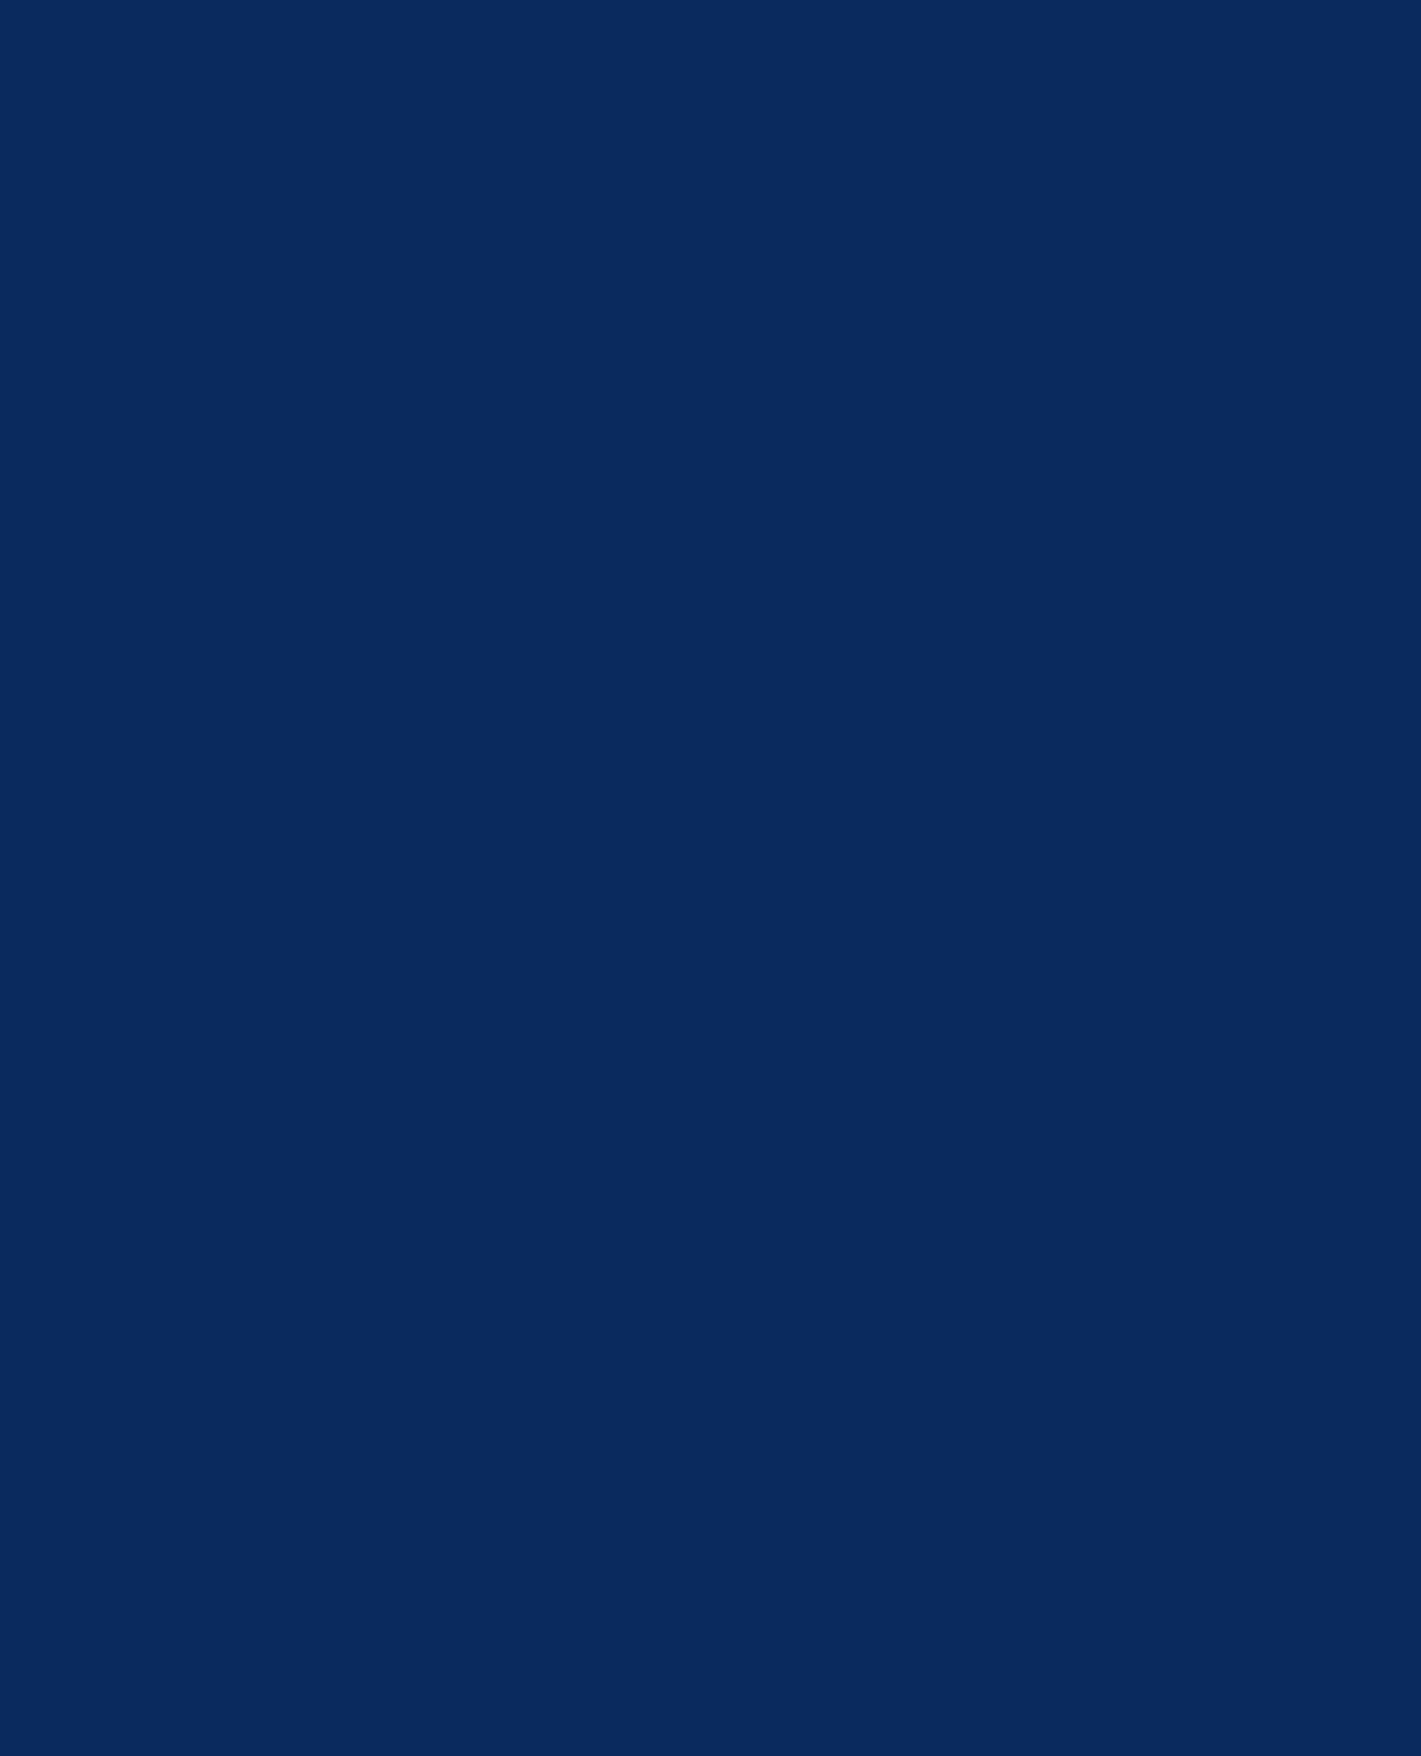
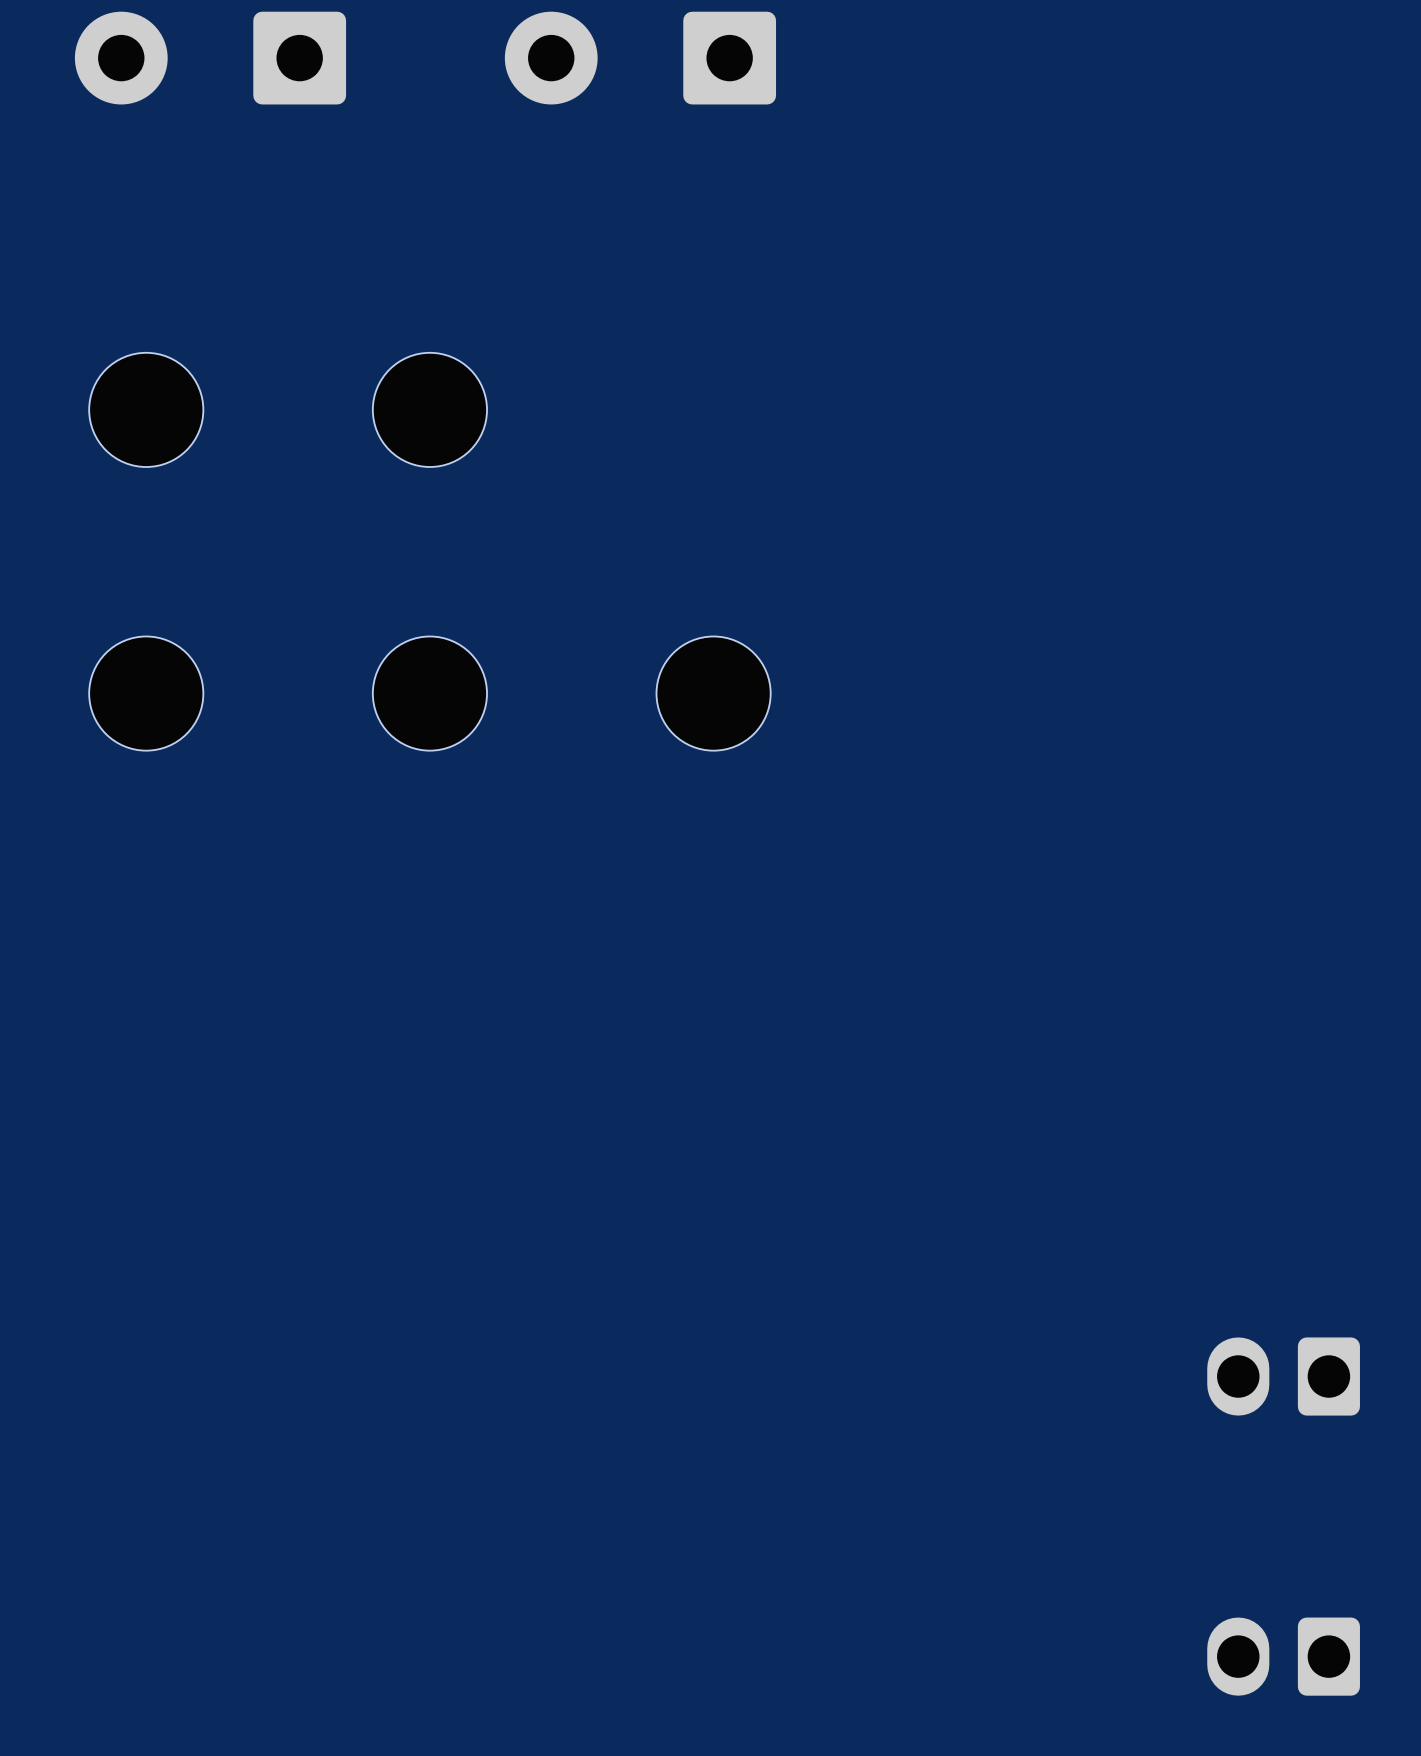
part: none -> (210, 58)
part: none -> (640, 58)
part: none -> (146, 409)
part: none -> (429, 409)
part: none -> (146, 693)
part: none -> (429, 693)
part: none -> (713, 693)
part: none -> (1283, 1376)
part: none -> (1283, 1656)

